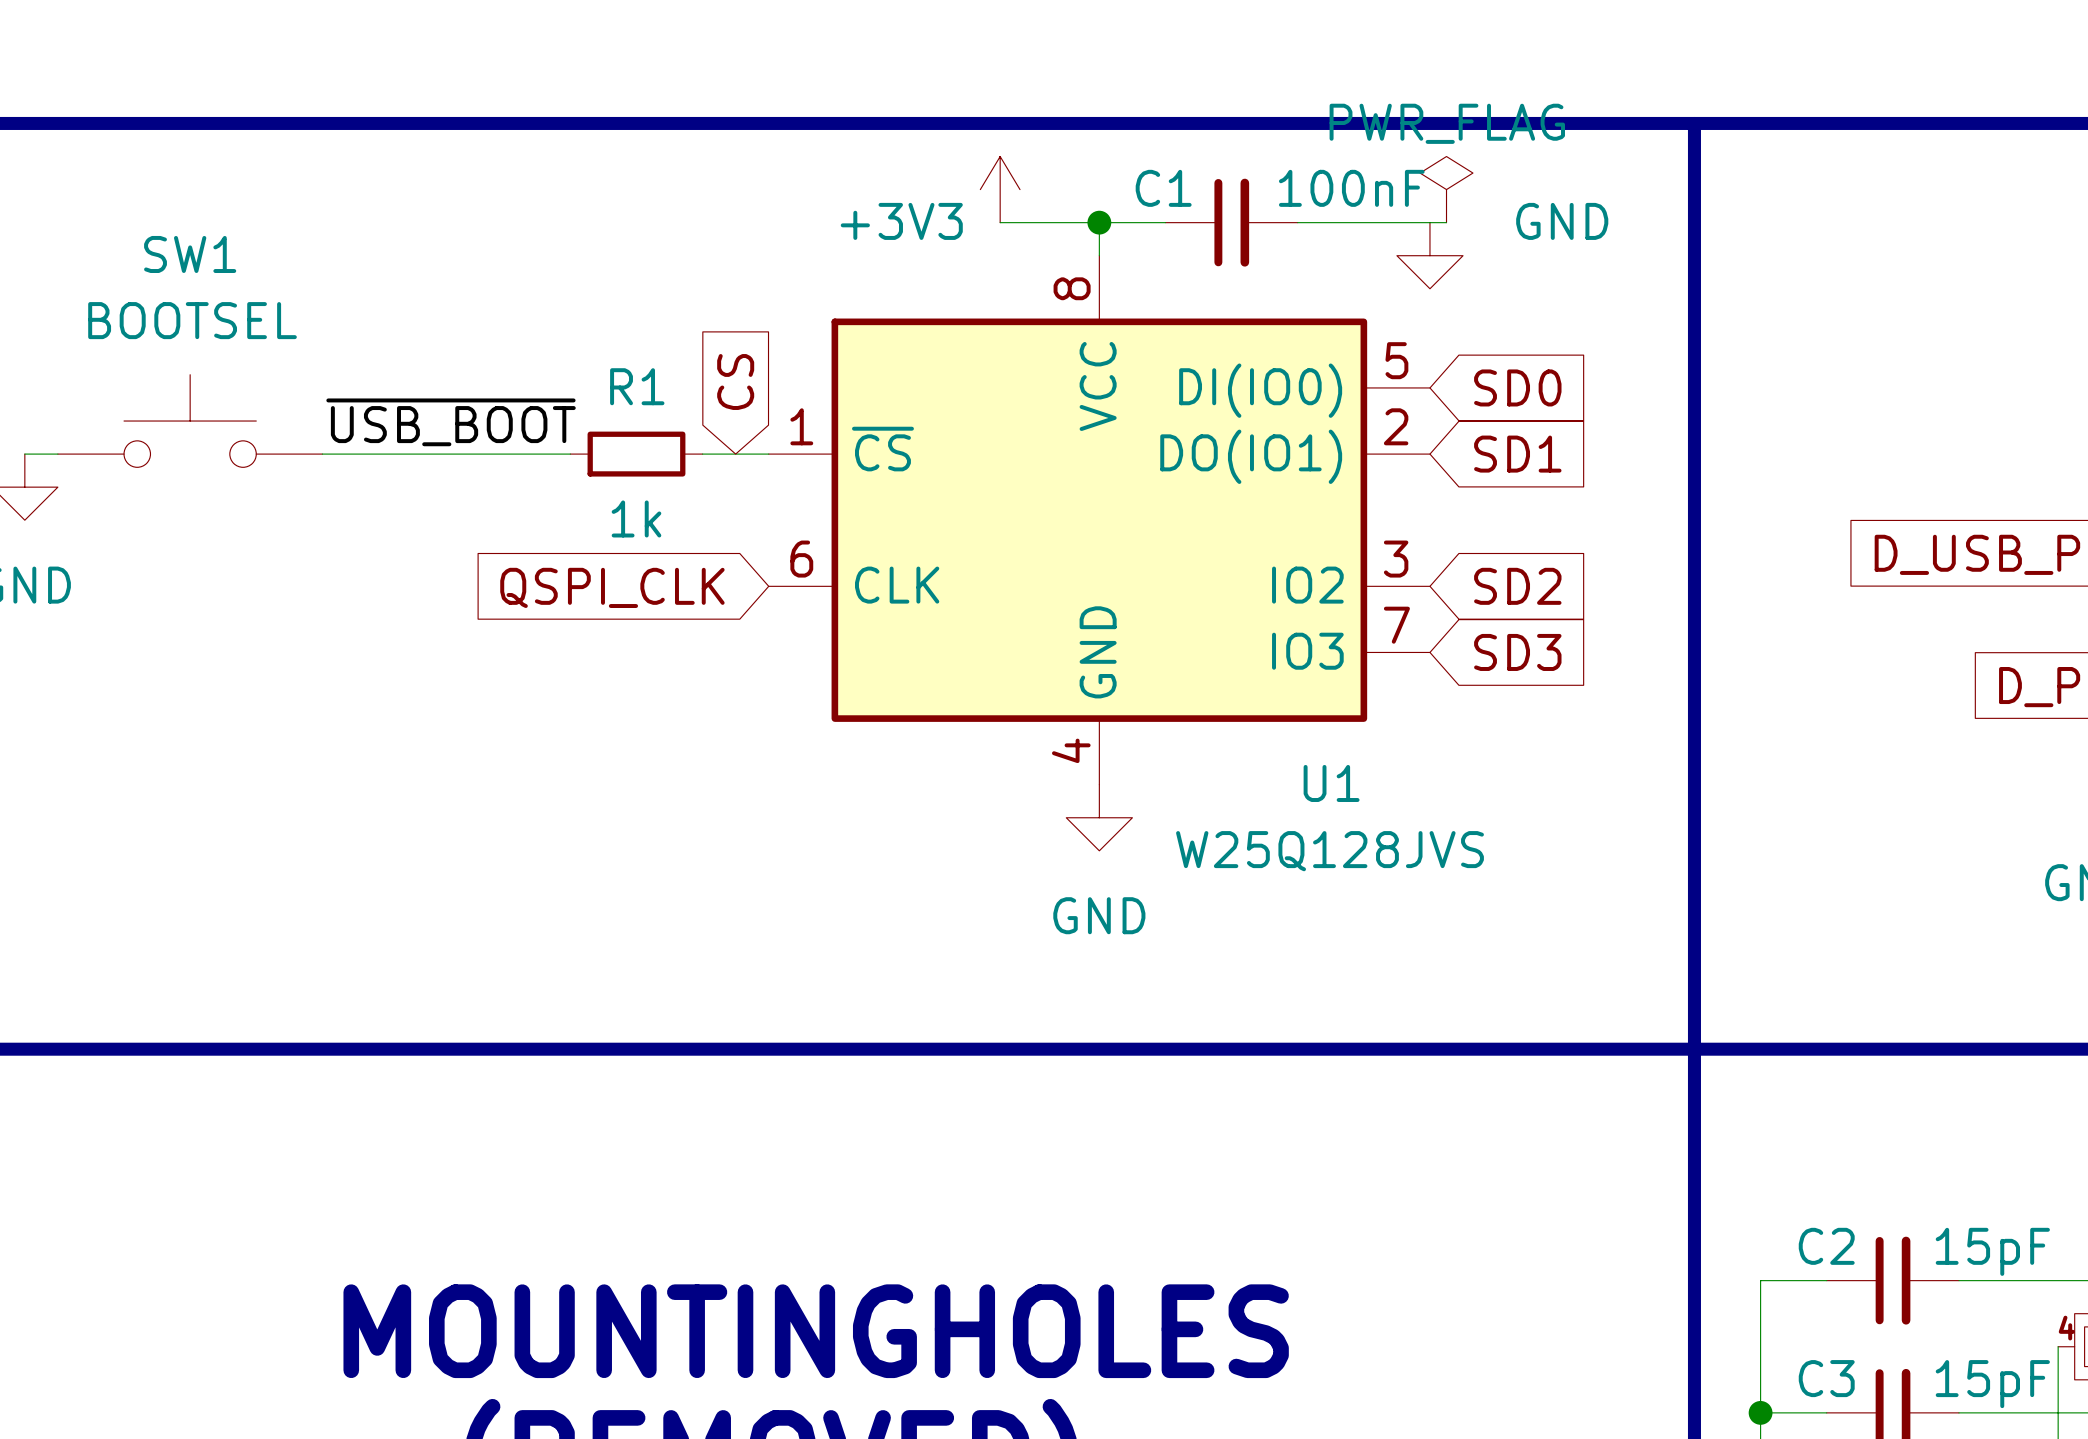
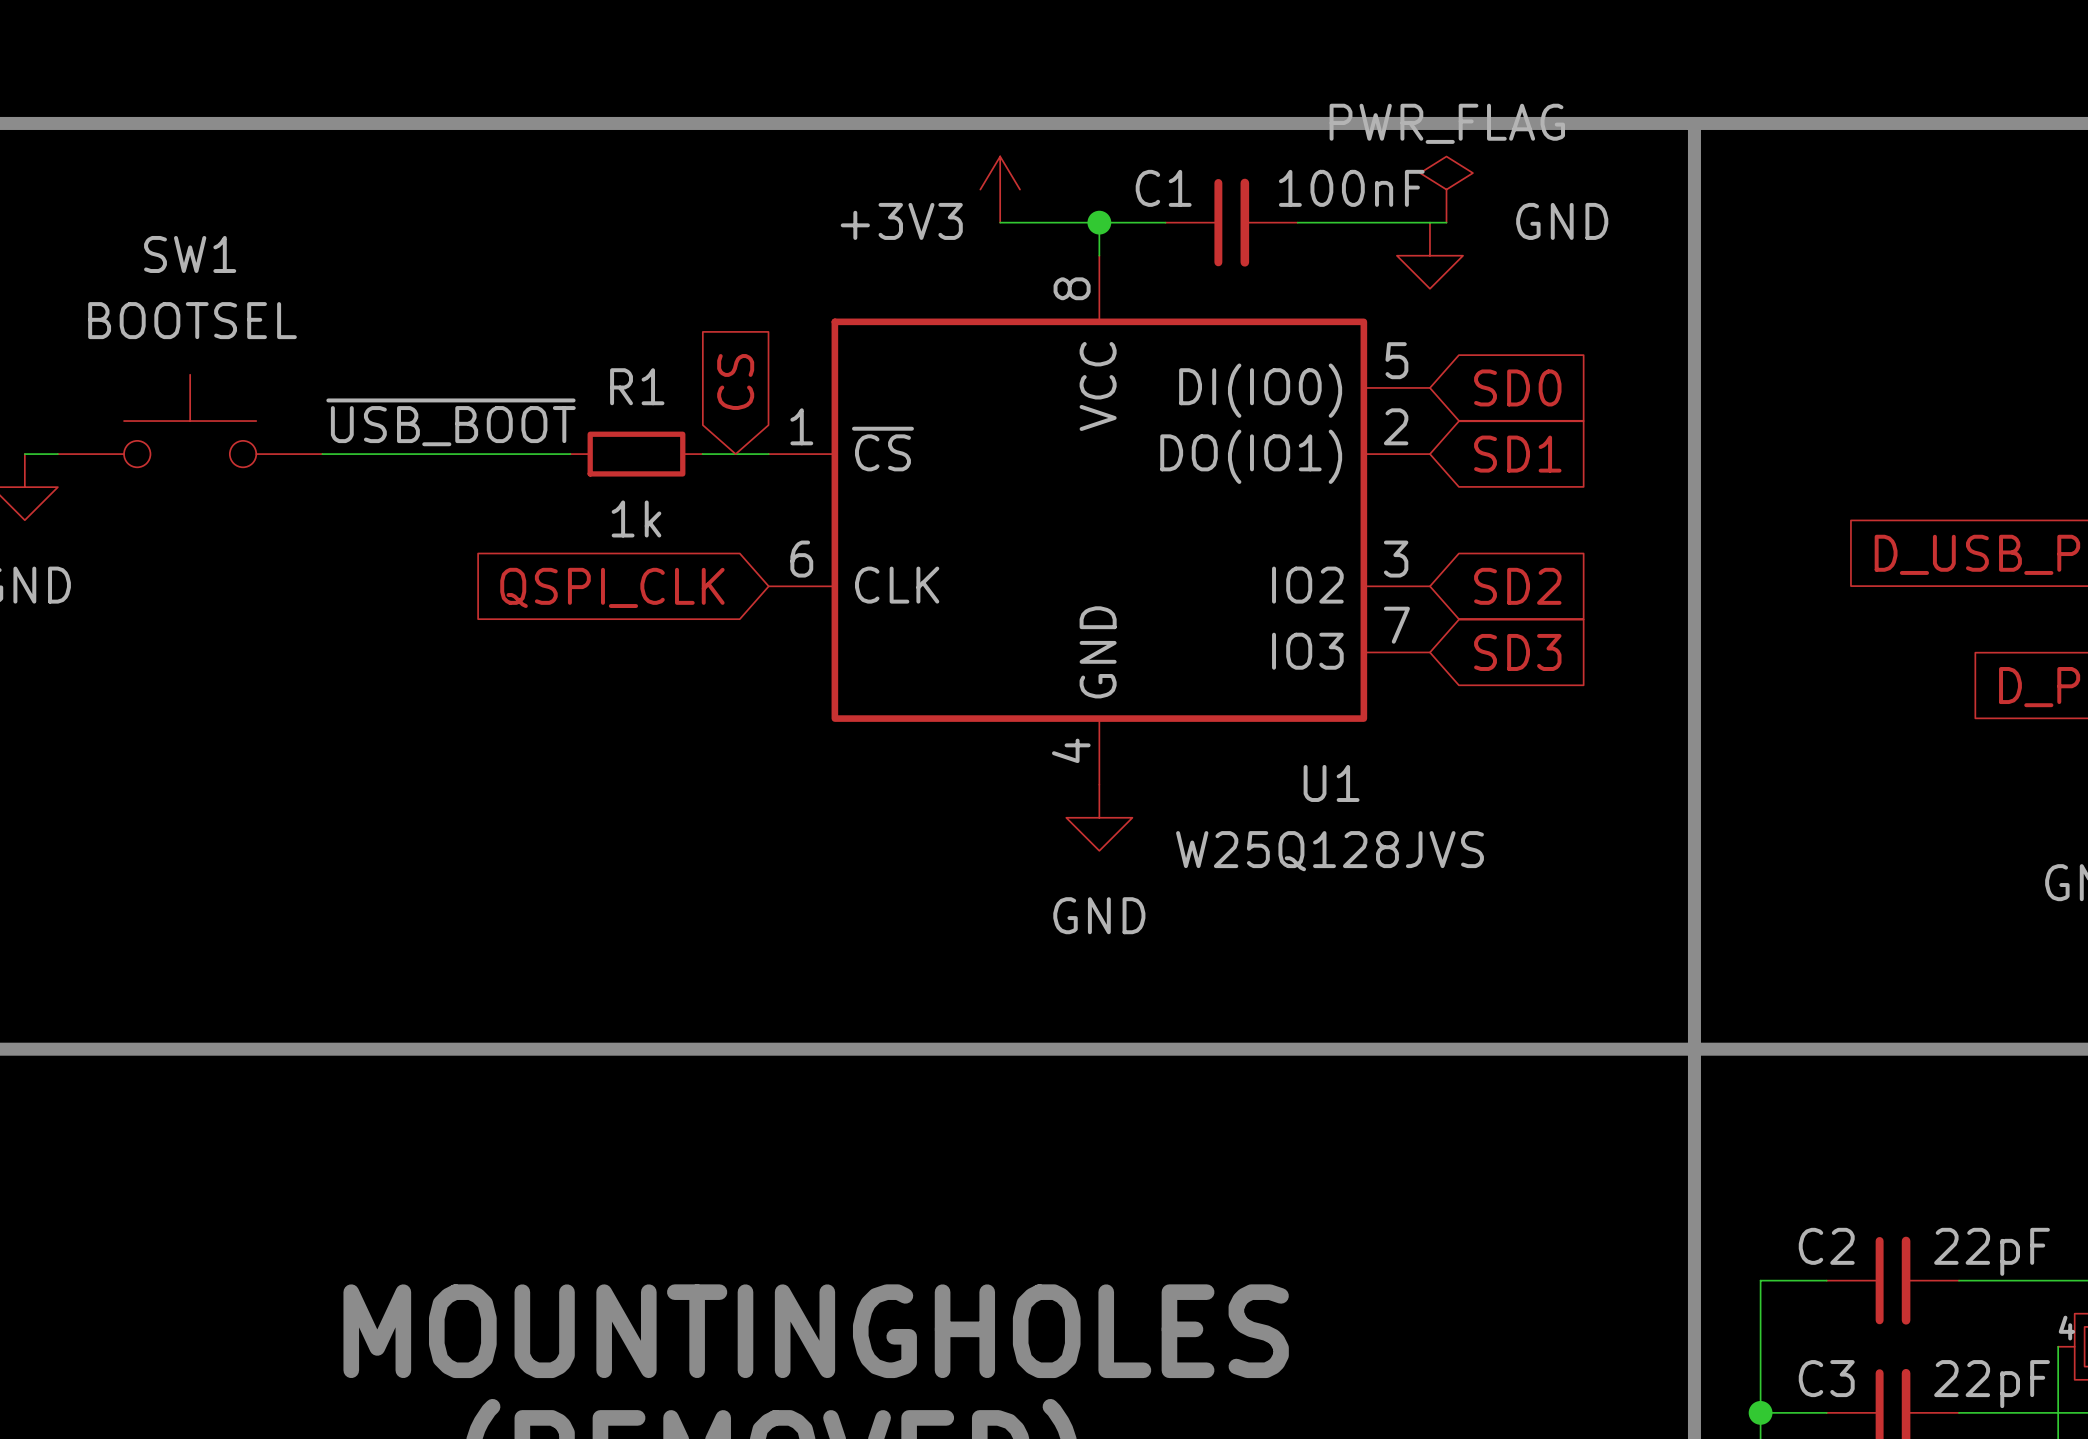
C2 value: 15pF (1992, 1251) -> 22pF (1992, 1251)
C3 value: 15pF (1992, 1384) -> 22pF (1992, 1384)

